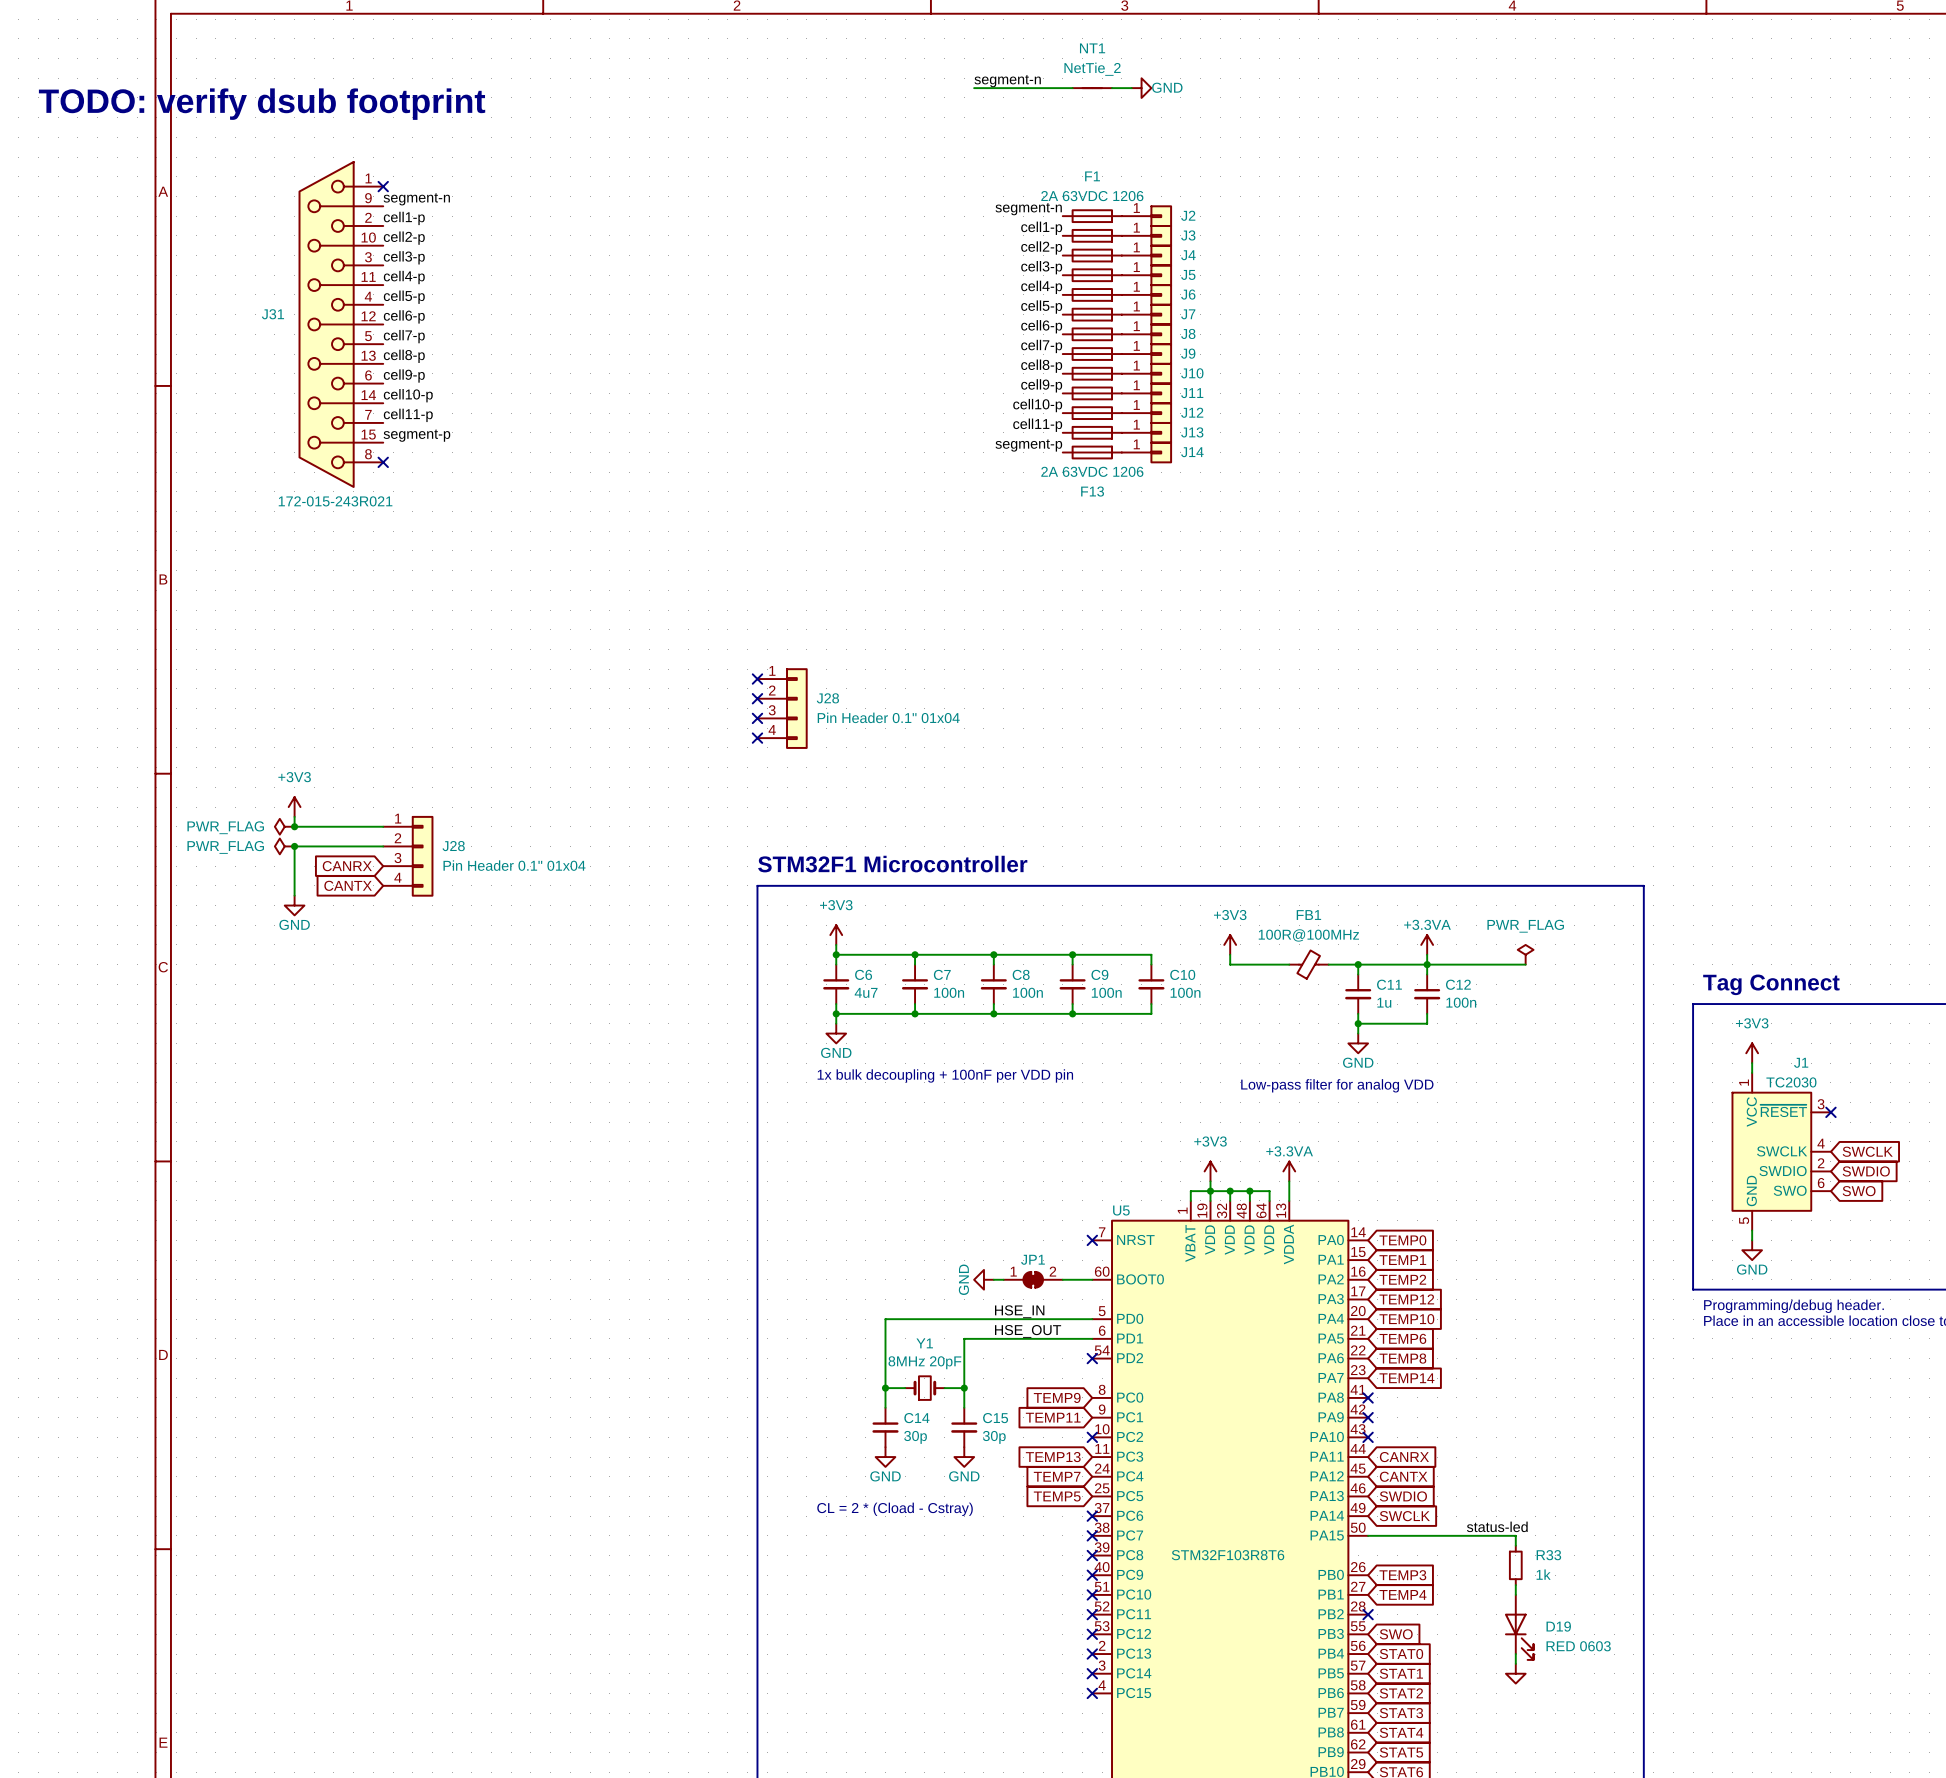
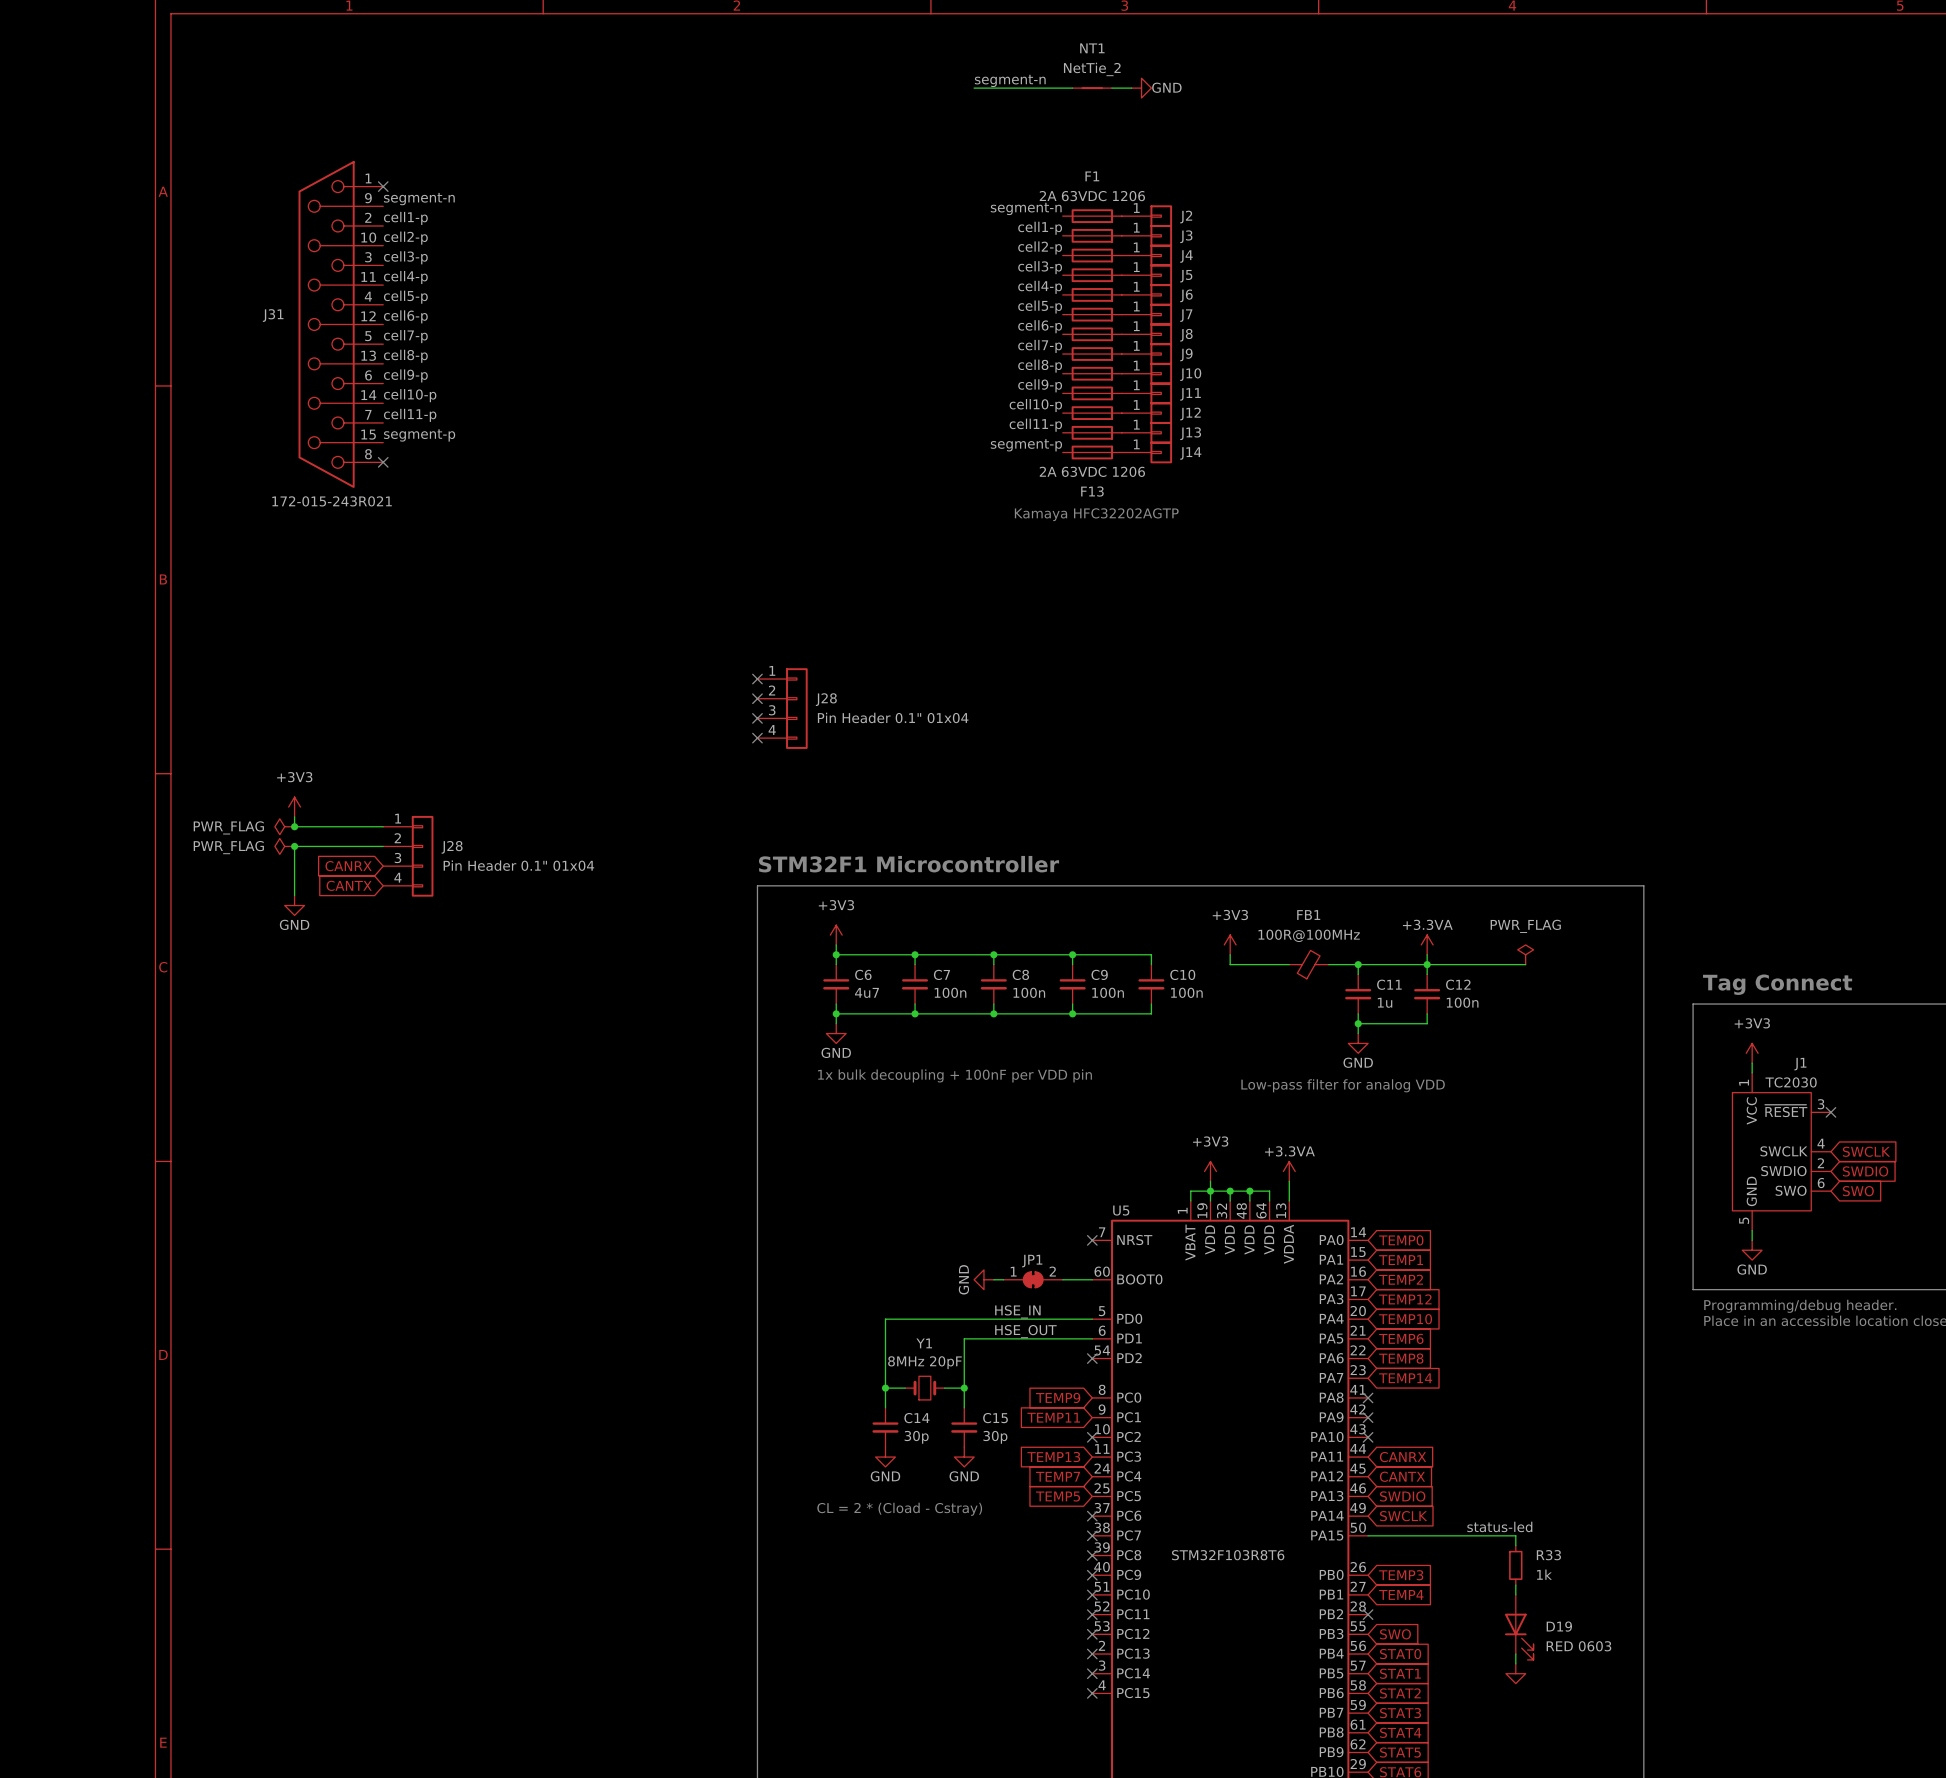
text: TODO: verify dsub footprint (262, 104) -> none
text: none -> Kamaya HFC32202AGTP (1096, 514)

